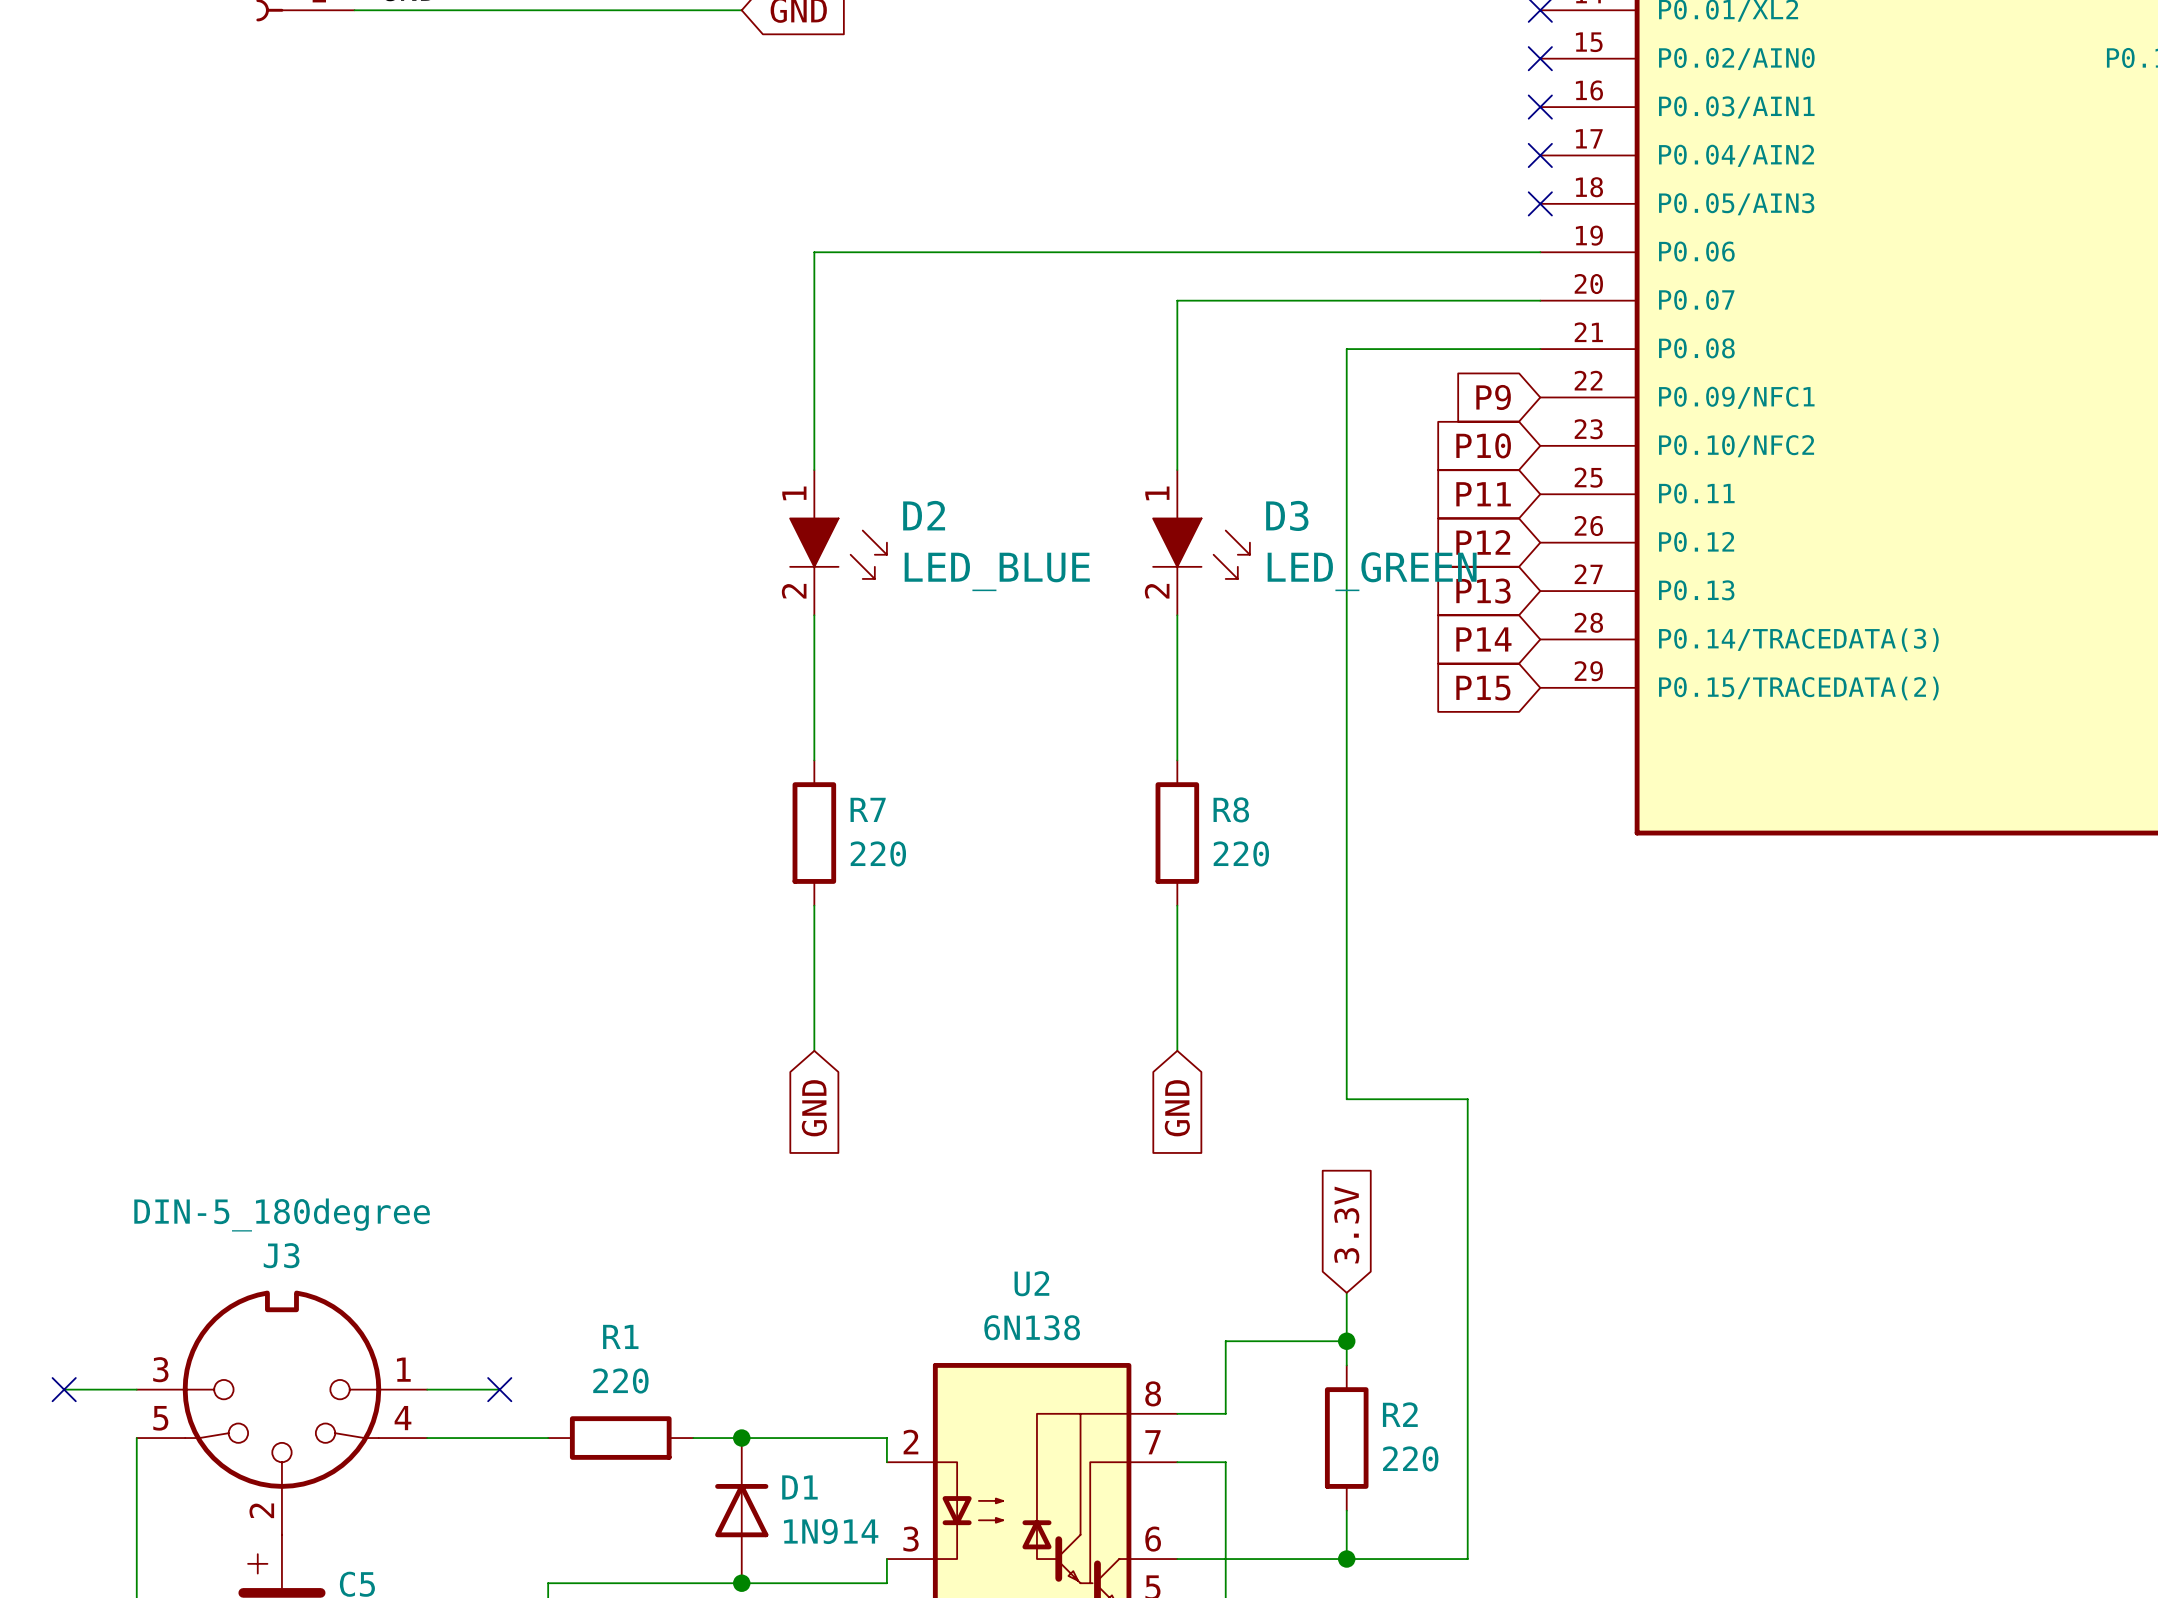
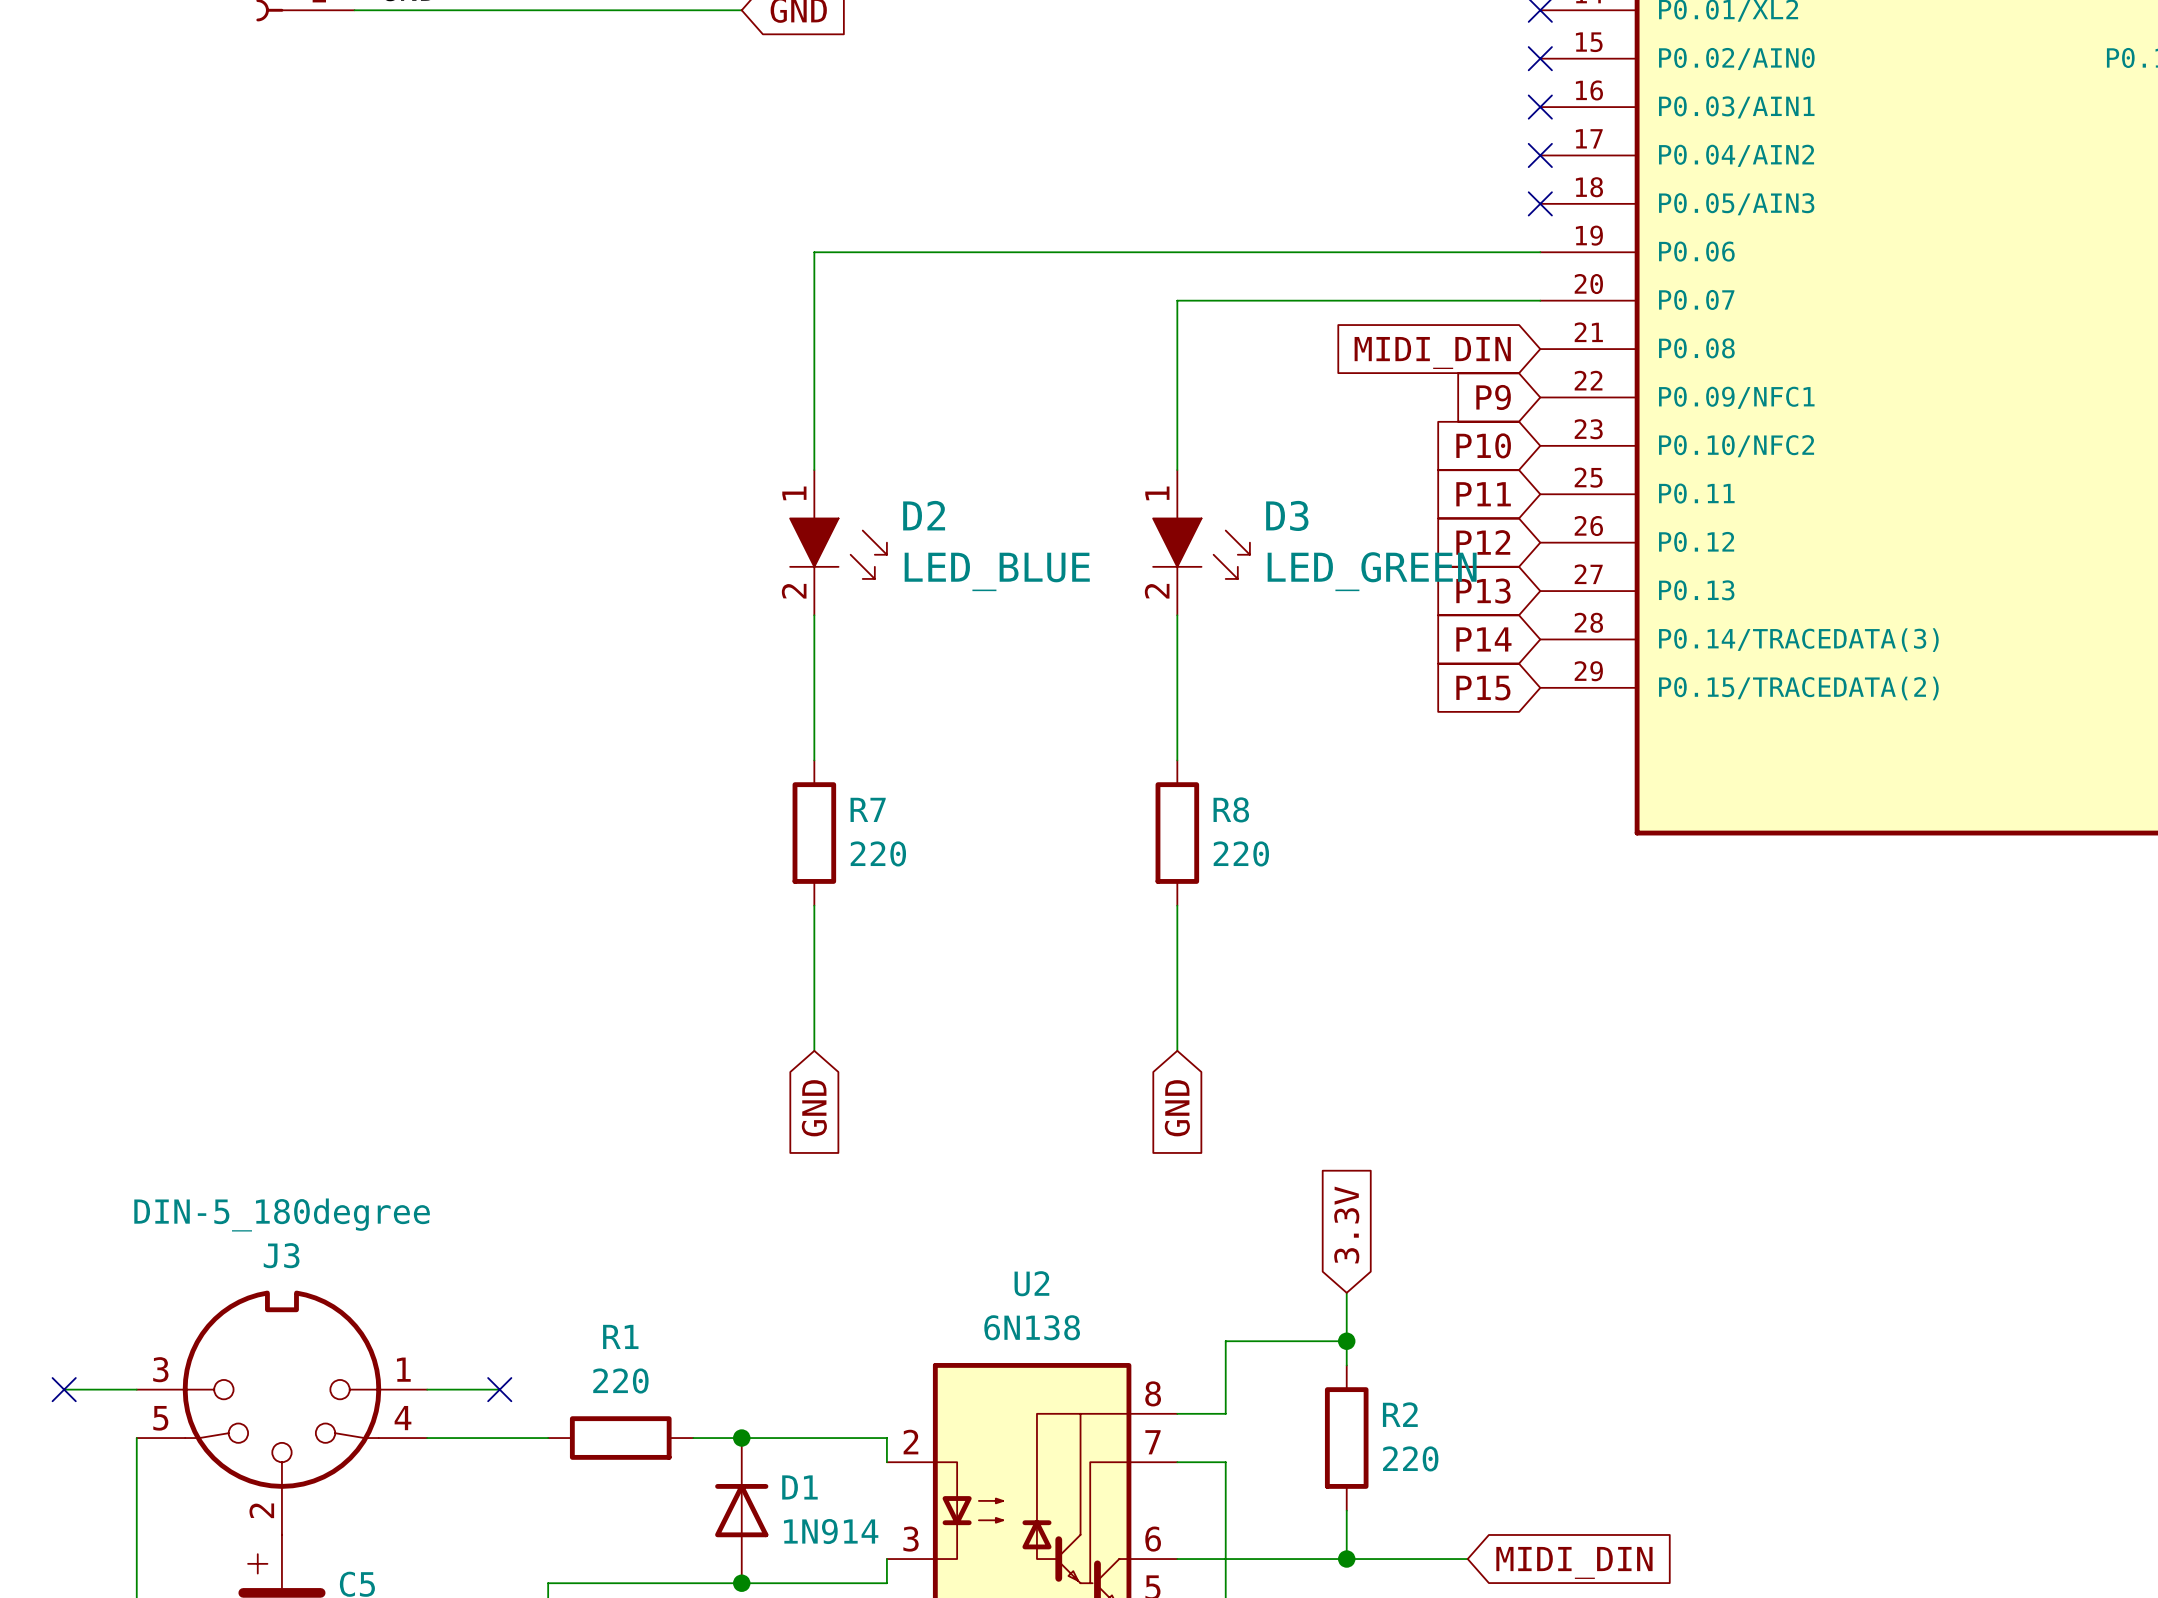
wire: (1540, 349) (1346, 349) (1346, 1099) (1467, 1099) (1467, 1559) -> none
global label: none -> MIDI_DIN (1432, 352)
global label: none -> MIDI_DIN (1574, 1562)

